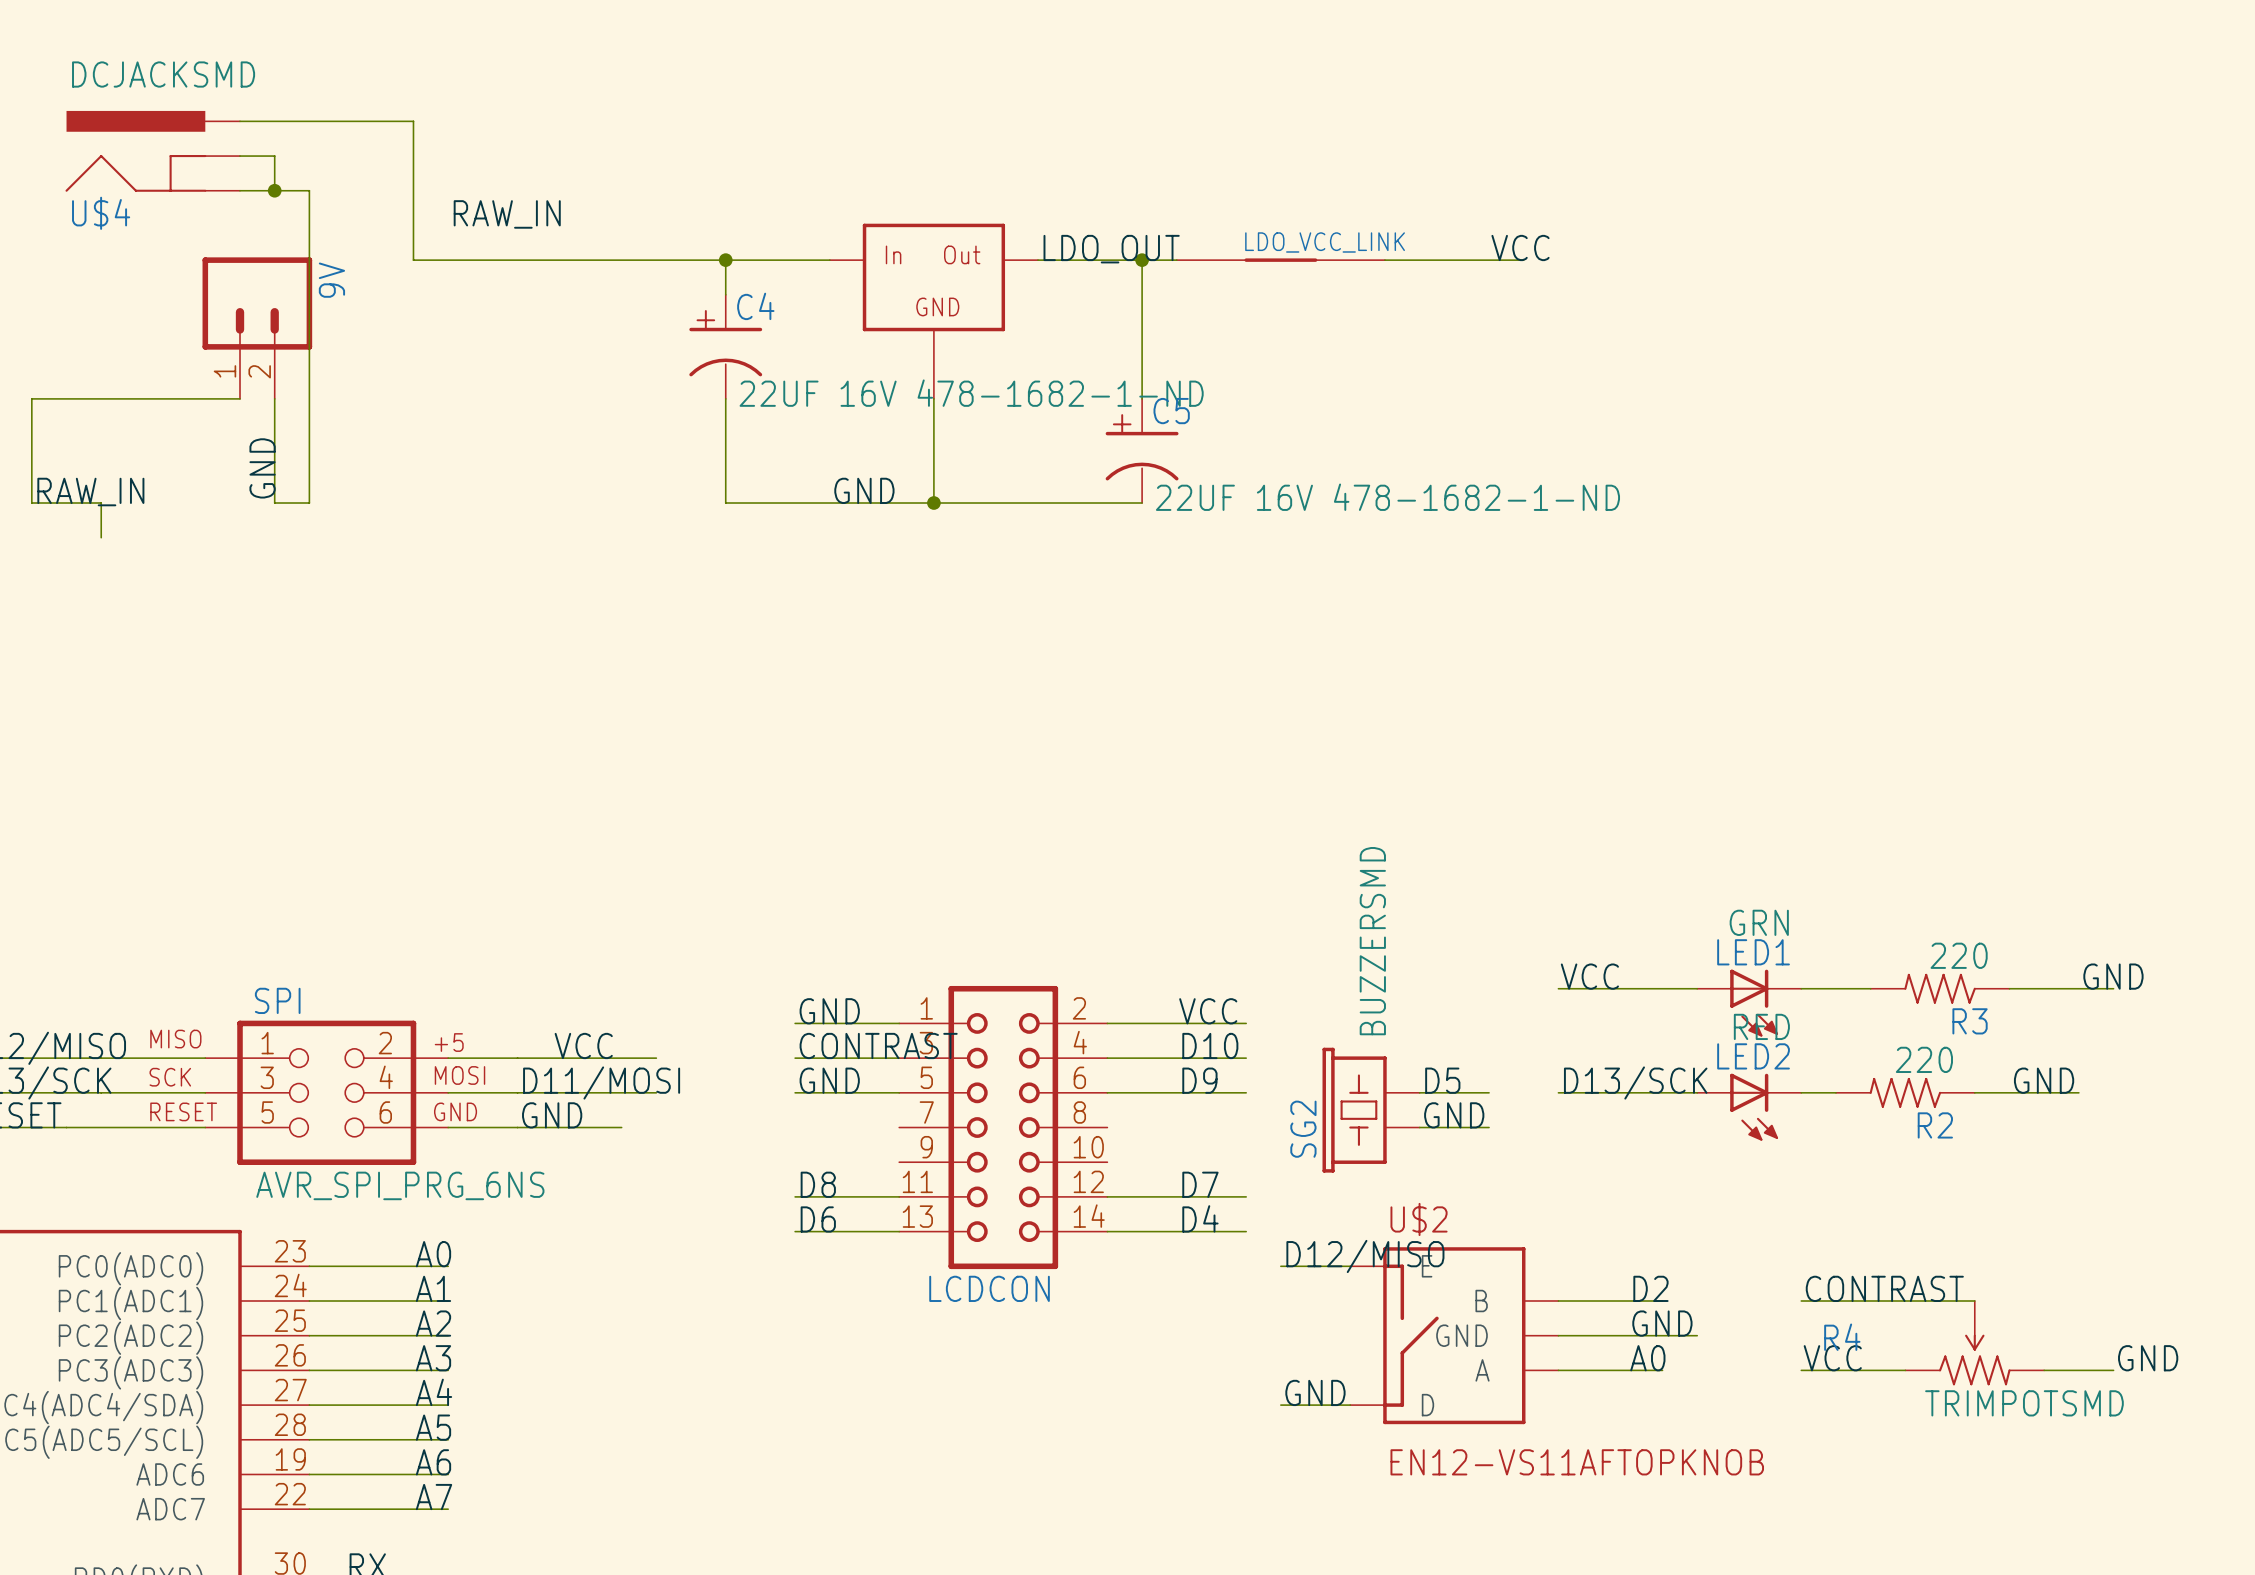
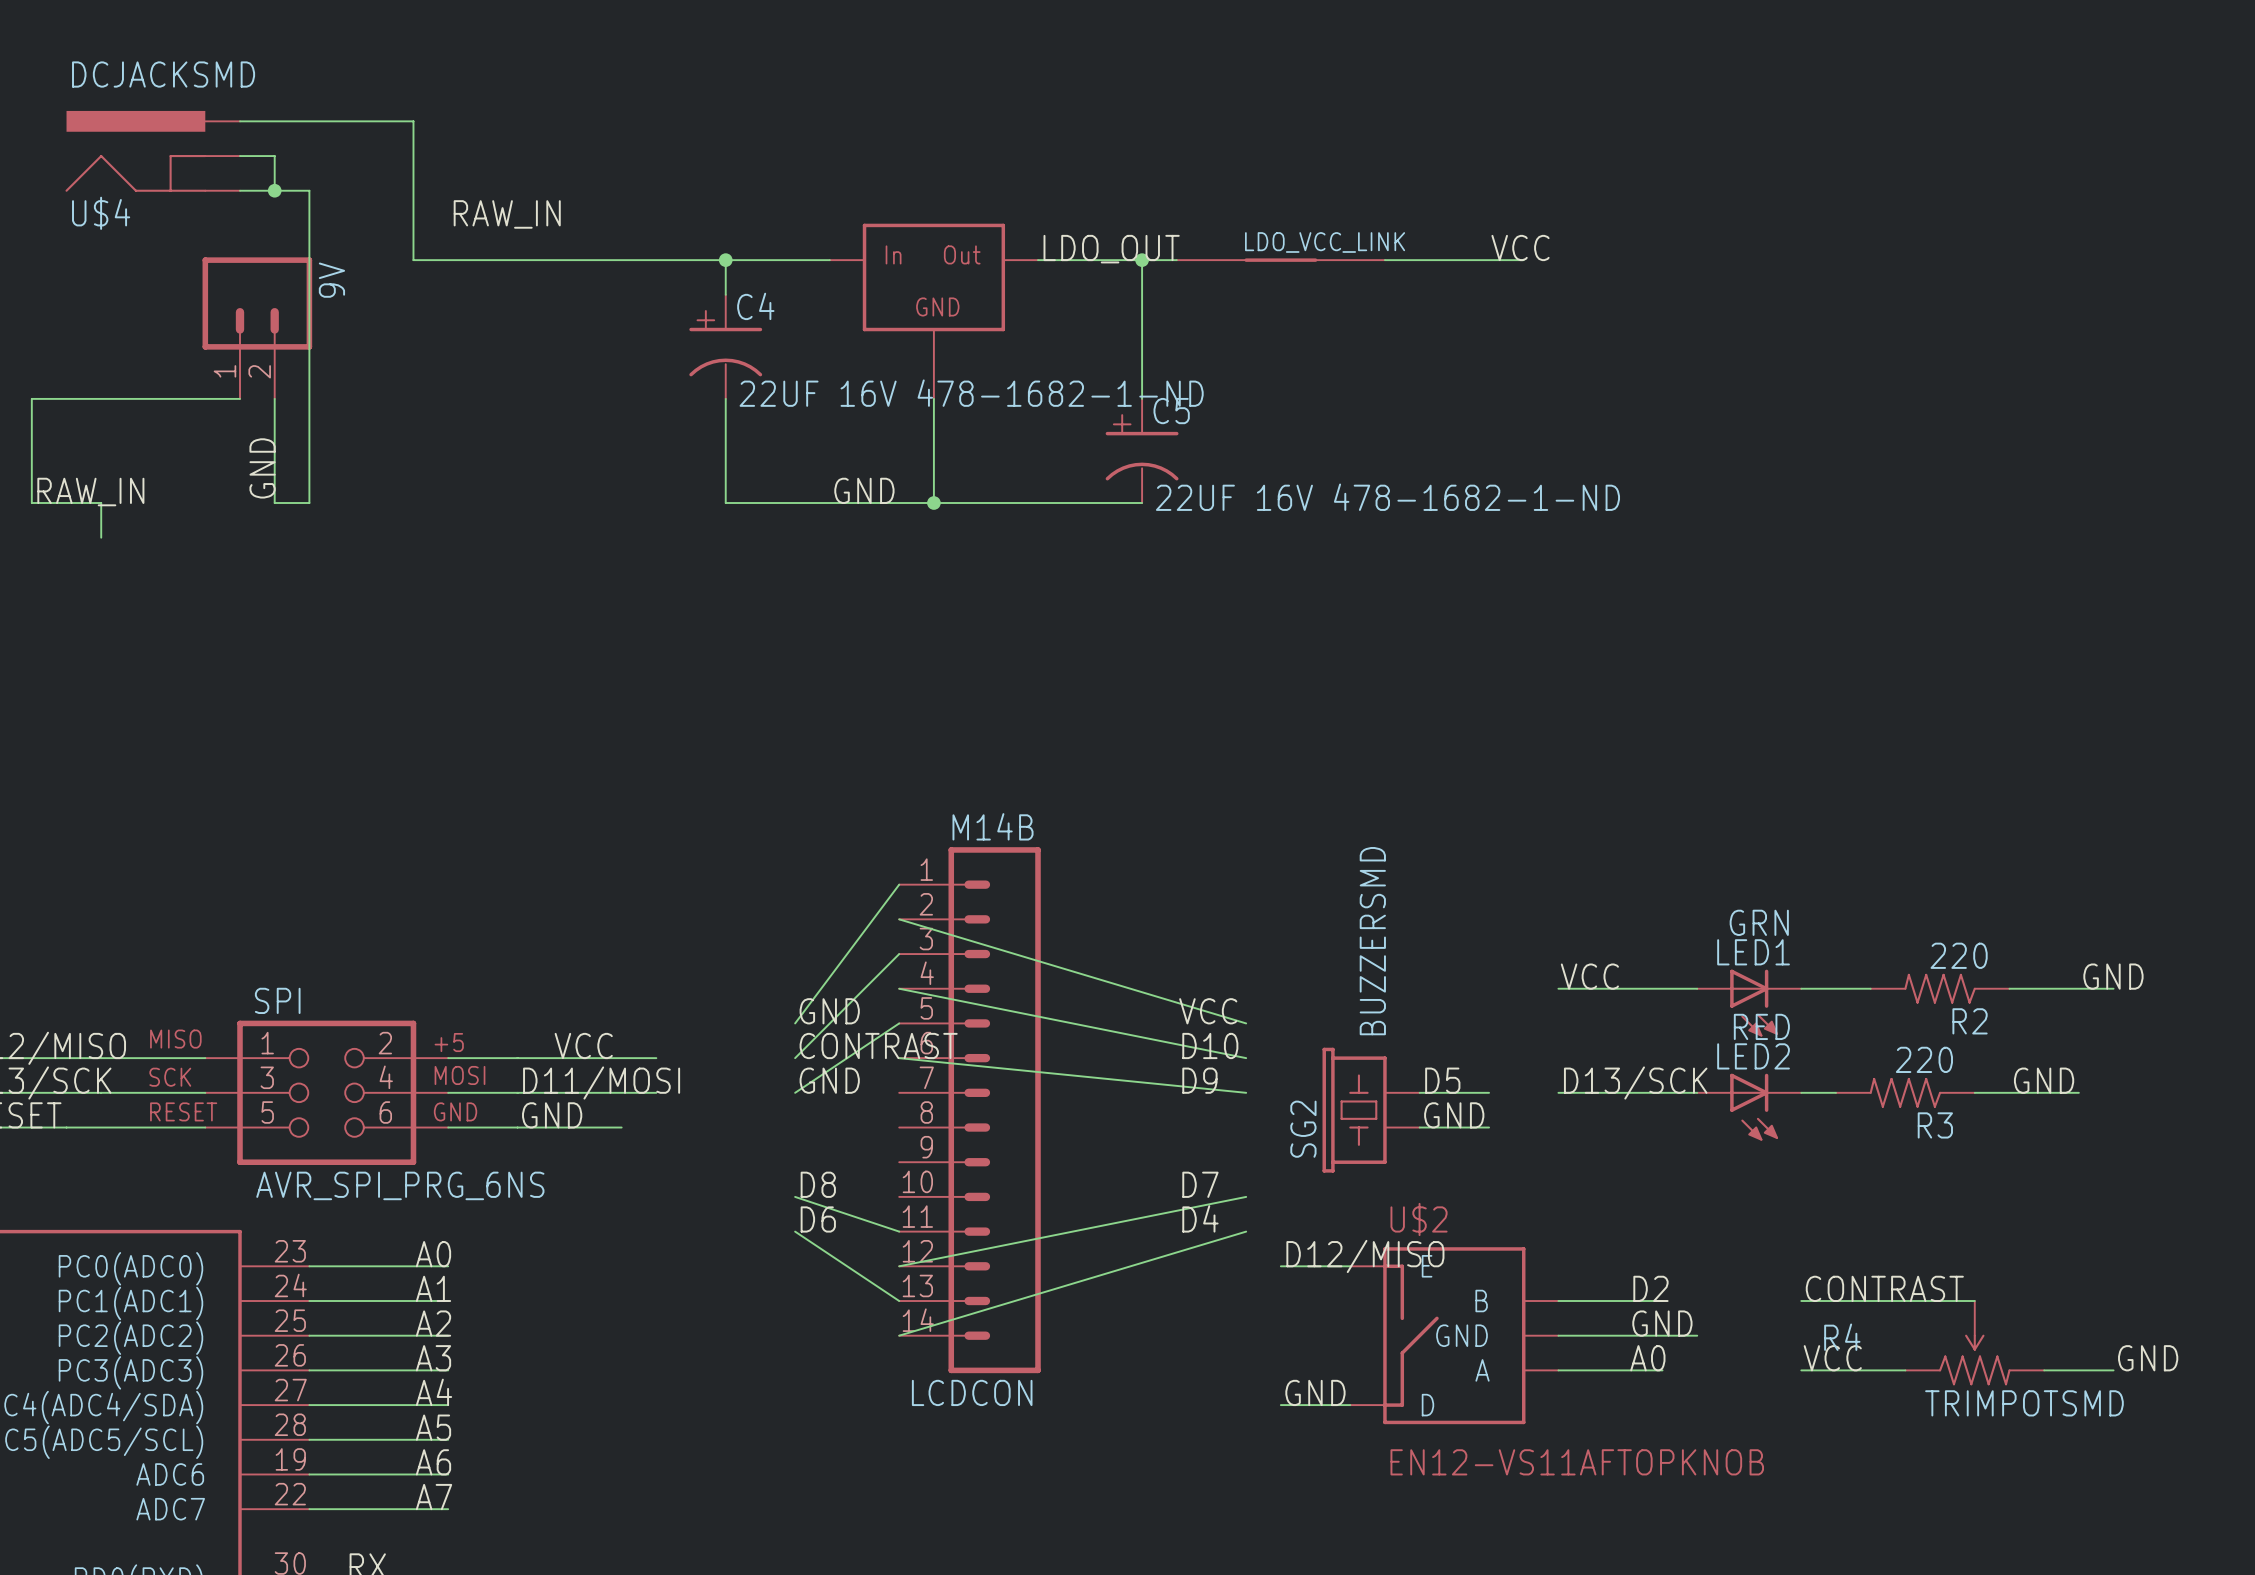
wire: none -> (899, 884) (795, 1023)
R3 name: R3 (1970, 1021) -> R2 (1970, 1021)
wire: (795, 1023) (899, 1023) -> (795, 1092) (899, 1023)
wire: (1107, 1023) (1246, 1023) -> (899, 919) (1246, 1023)
wire: (795, 1058) (899, 1058) -> (795, 1058) (899, 954)
wire: (1107, 1058) (1246, 1058) -> (899, 988) (1246, 1058)
wire: (795, 1092) (899, 1092) -> none
wire: (1107, 1092) (1246, 1092) -> (899, 1058) (1246, 1092)
LCDCON: none -> M14B (970, 1110)
R2 name: R2 (1935, 1125) -> R3 (1935, 1125)
LCDCON: (1003, 1127) -> none
wire: (795, 1196) (899, 1196) -> (795, 1196) (899, 1231)
wire: (1107, 1196) (1246, 1196) -> (899, 1266) (1246, 1196)
wire: (795, 1231) (899, 1231) -> (795, 1231) (899, 1301)
wire: (1107, 1231) (1246, 1231) -> (899, 1335) (1246, 1231)

